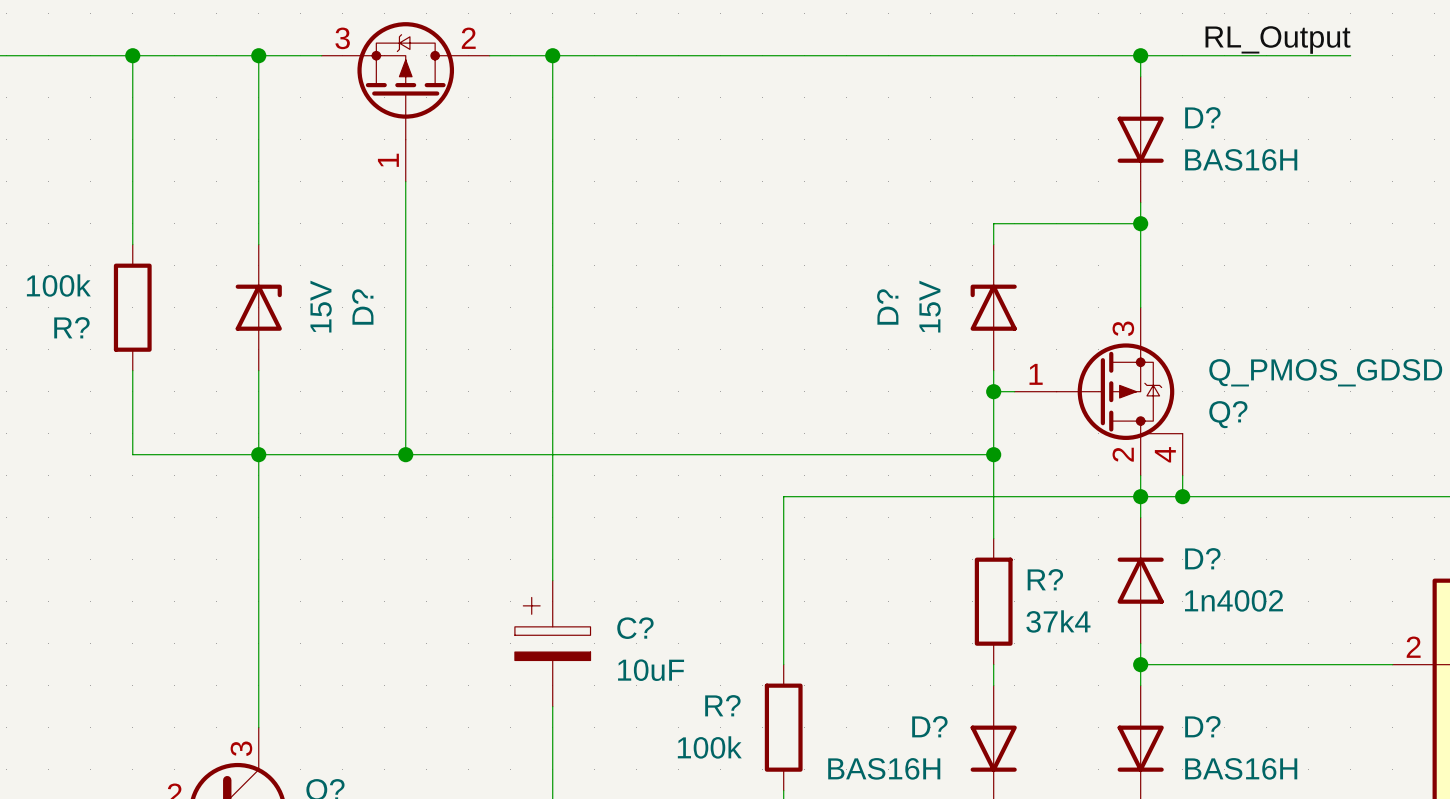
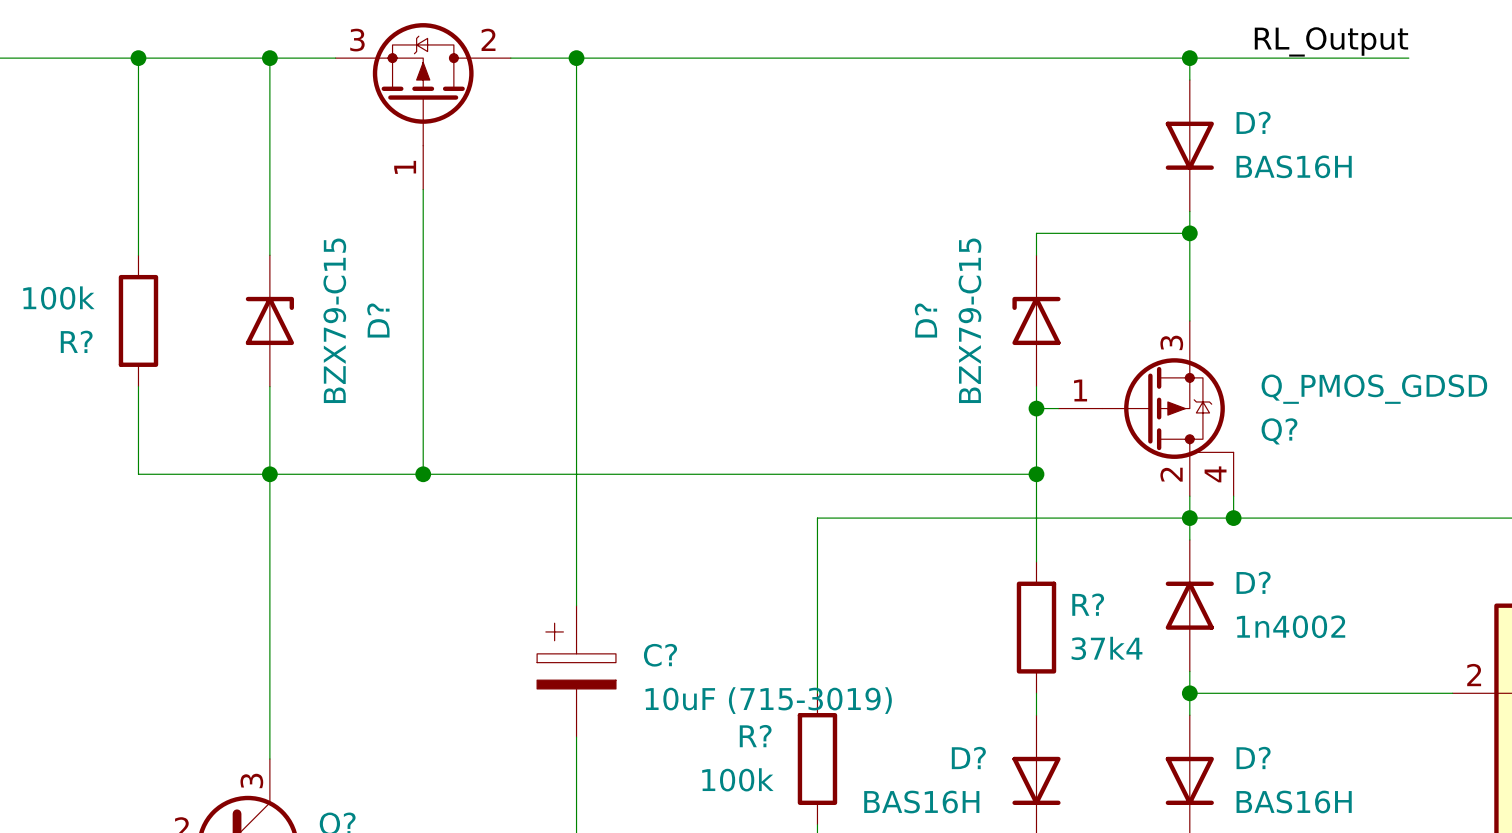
D? value: 15V (321, 306) -> BZX79-C15 (334, 320)
D? value: 15V (930, 306) -> BZX79-C15 (969, 320)
C? value: 10uF (651, 670) -> 10uF (715-3019) (768, 700)

